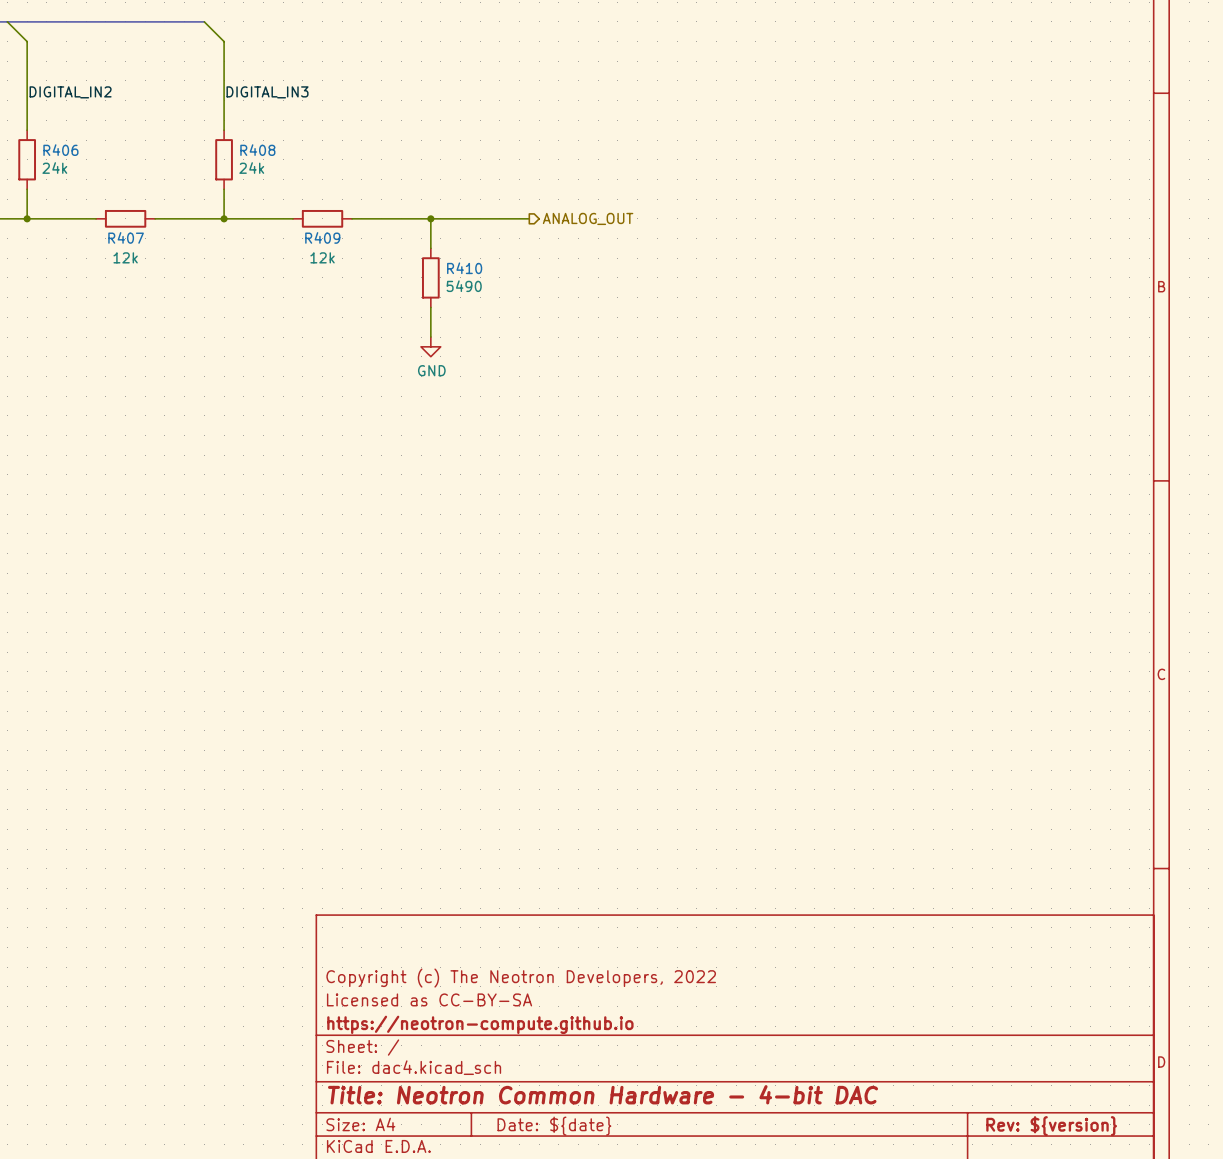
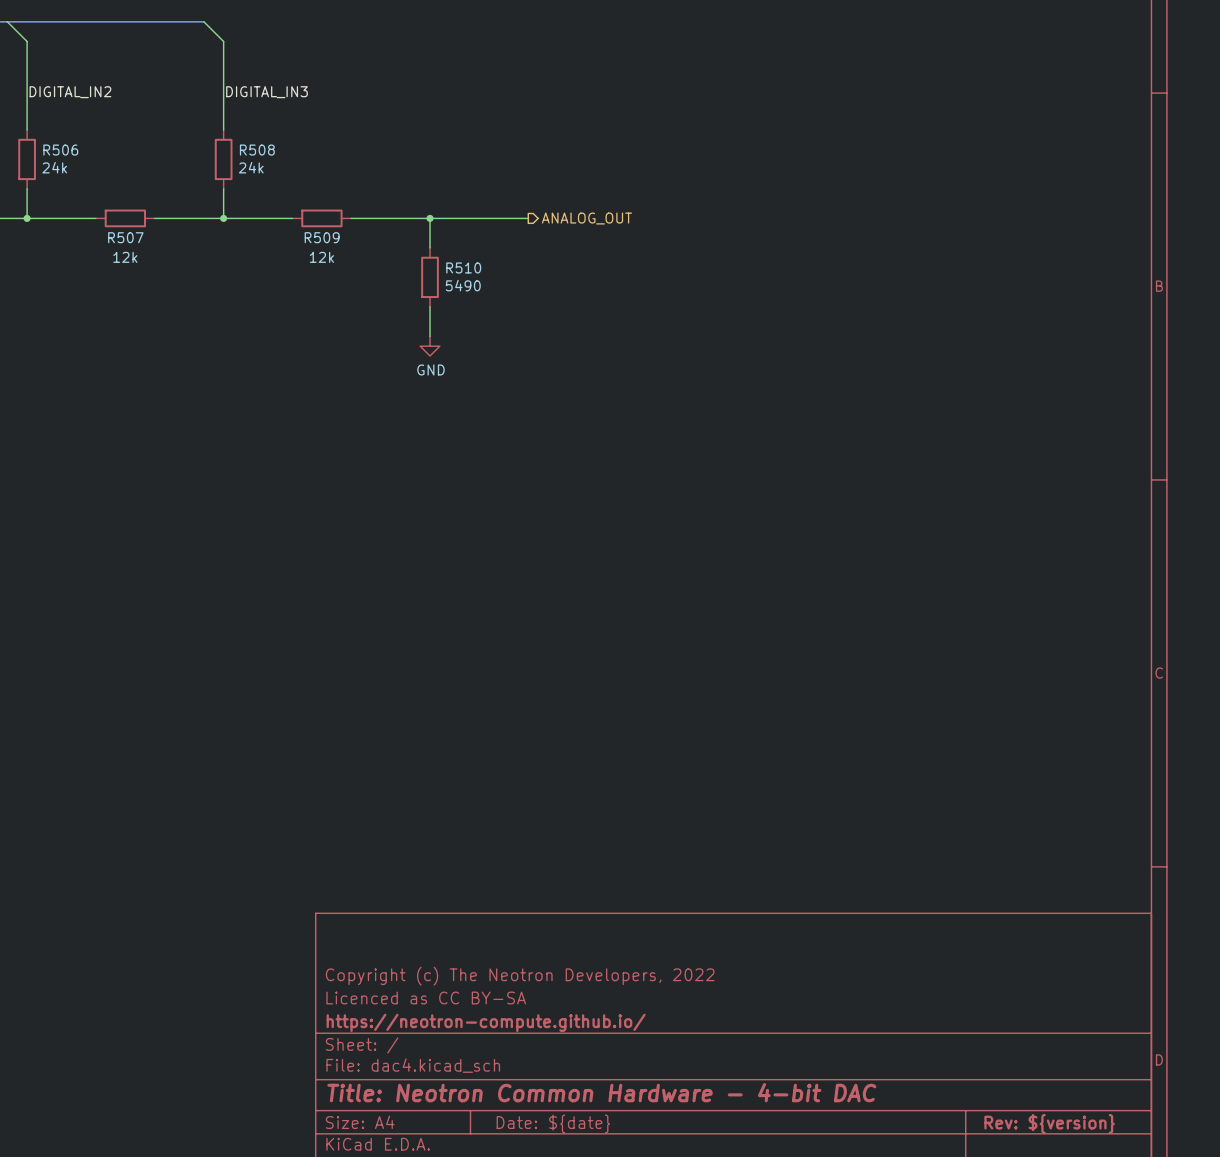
R406 name: R406 (60, 150) -> R506 (60, 150)
R408 name: R408 (257, 150) -> R508 (257, 150)
R407 name: R407 (126, 237) -> R507 (125, 237)
R409 name: R409 (322, 237) -> R509 (322, 237)
R410 name: R410 (464, 268) -> R510 (463, 267)
title block: Licensed as CC-BY-SA (429, 999) -> Licenced as CC BY-SA (426, 997)
title block: https://neotron-compute.github.io (480, 1024) -> https://neotron-compute.github.io/ (486, 1022)

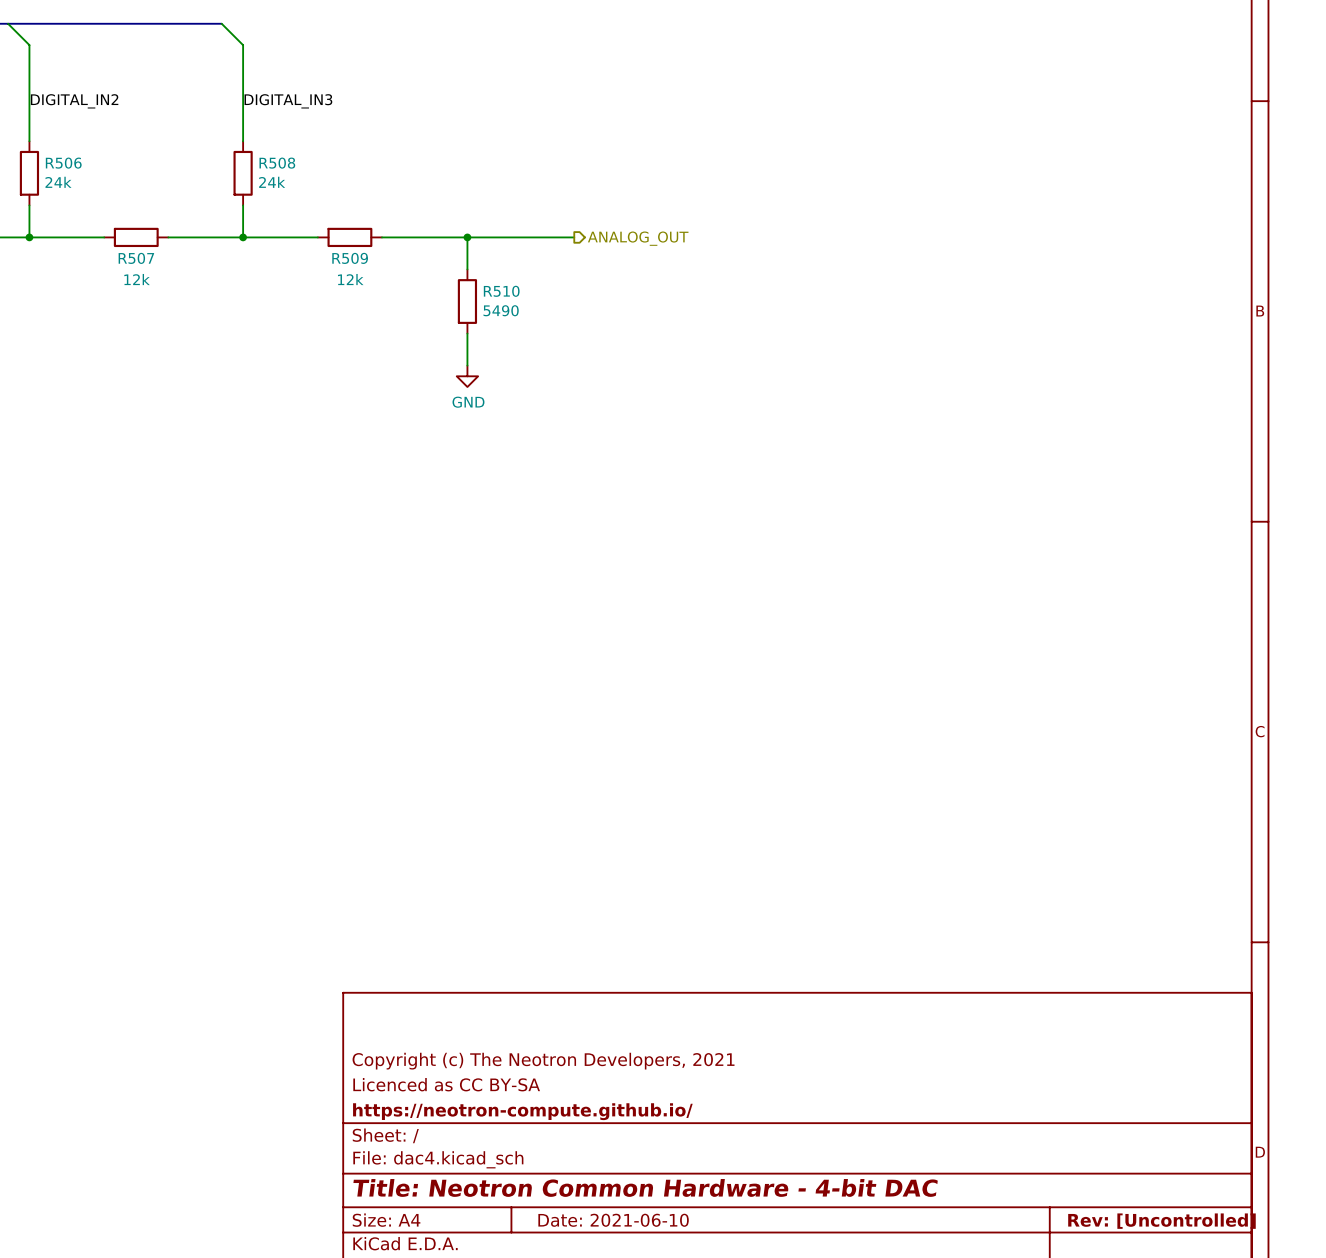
title block: Copyright (c) The Neotron Developers, 2022 (520, 976) -> Copyright (c) The Neotron Developers, 2021 (543, 1061)
title block: Date: ${date} (553, 1123) -> Date: 2021-06-10 (613, 1220)
title block: Rev: ${version} (1049, 1123) -> Rev: [Uncontrolled] (1161, 1221)

